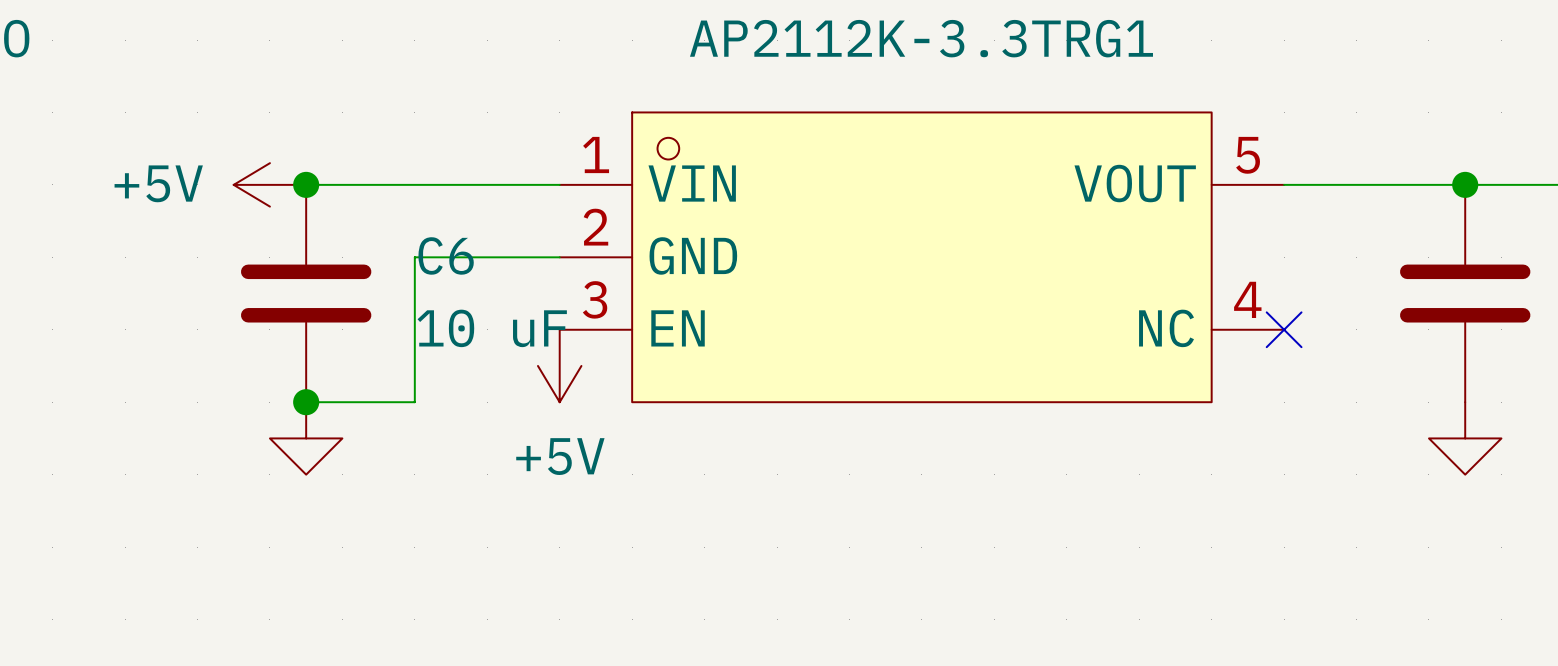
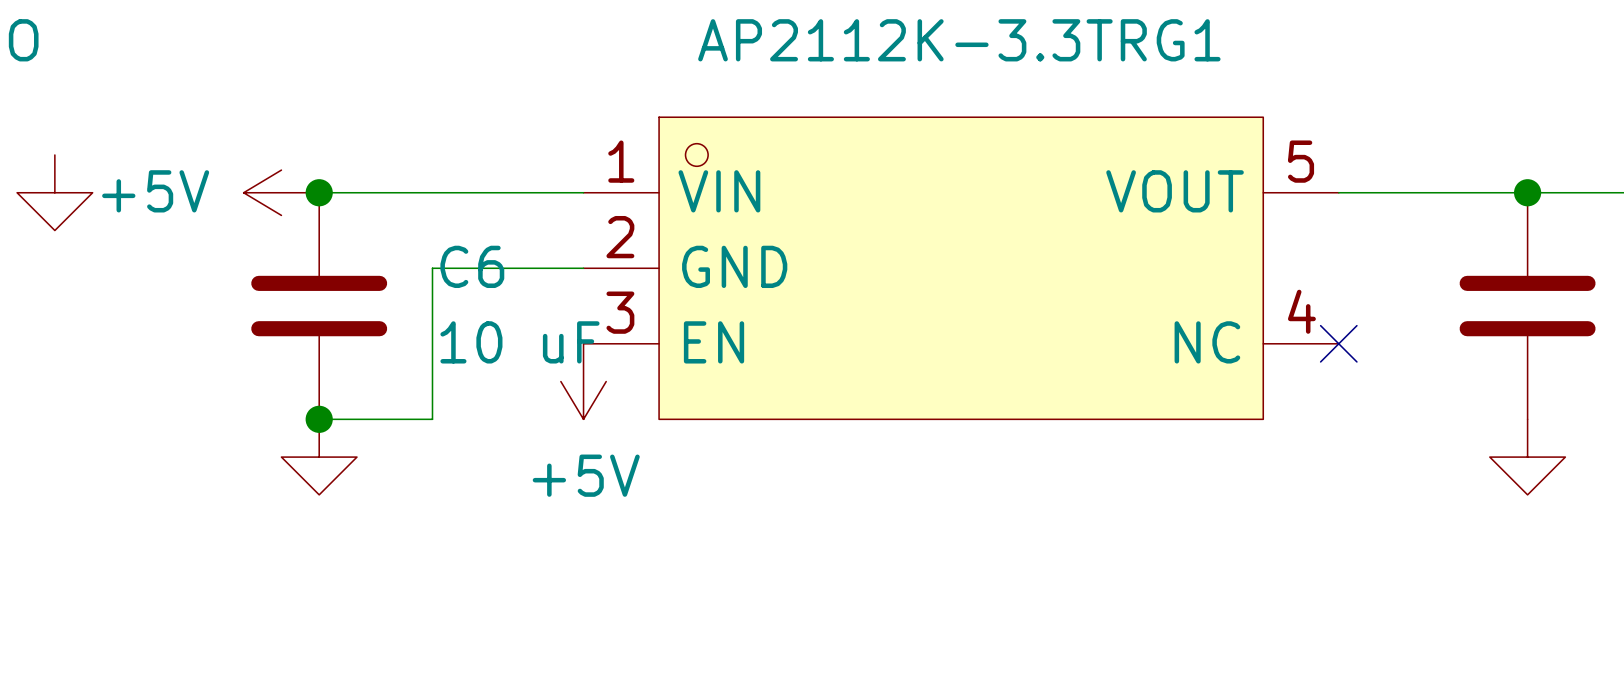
power symbol: none -> (54, 192)

